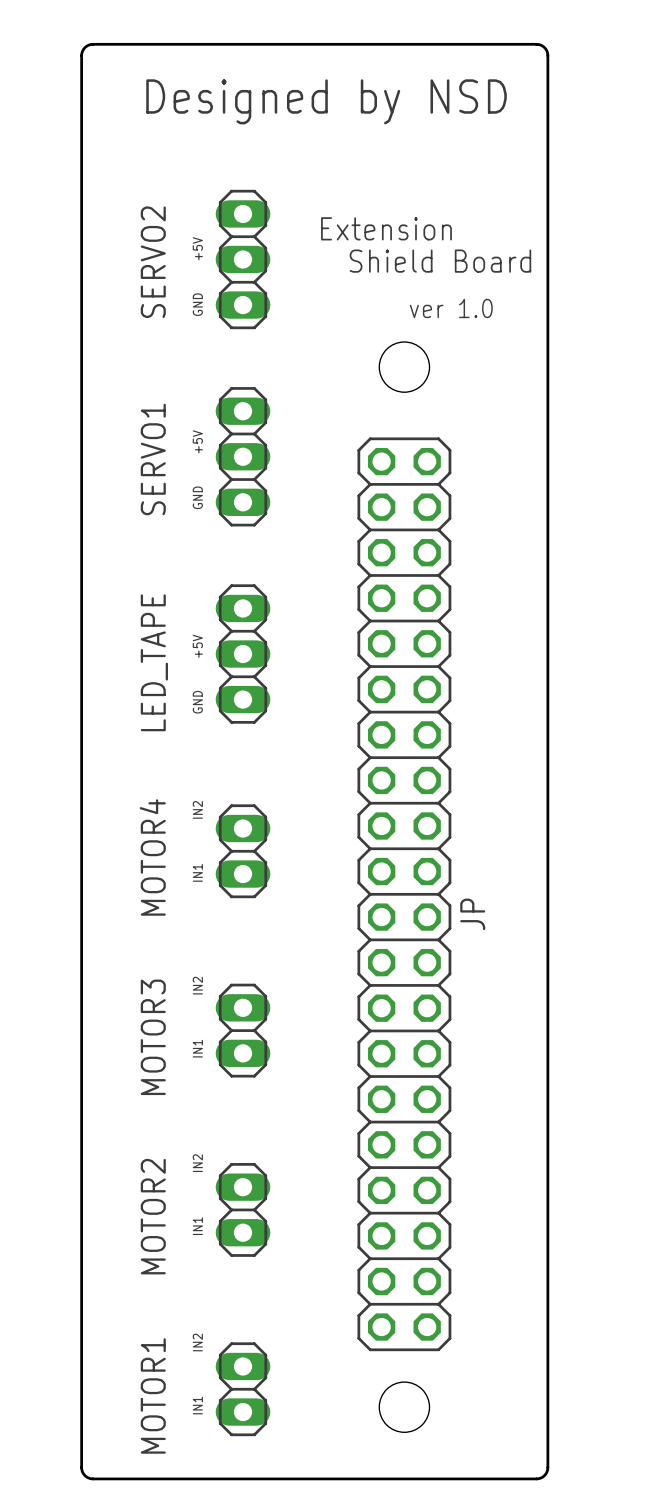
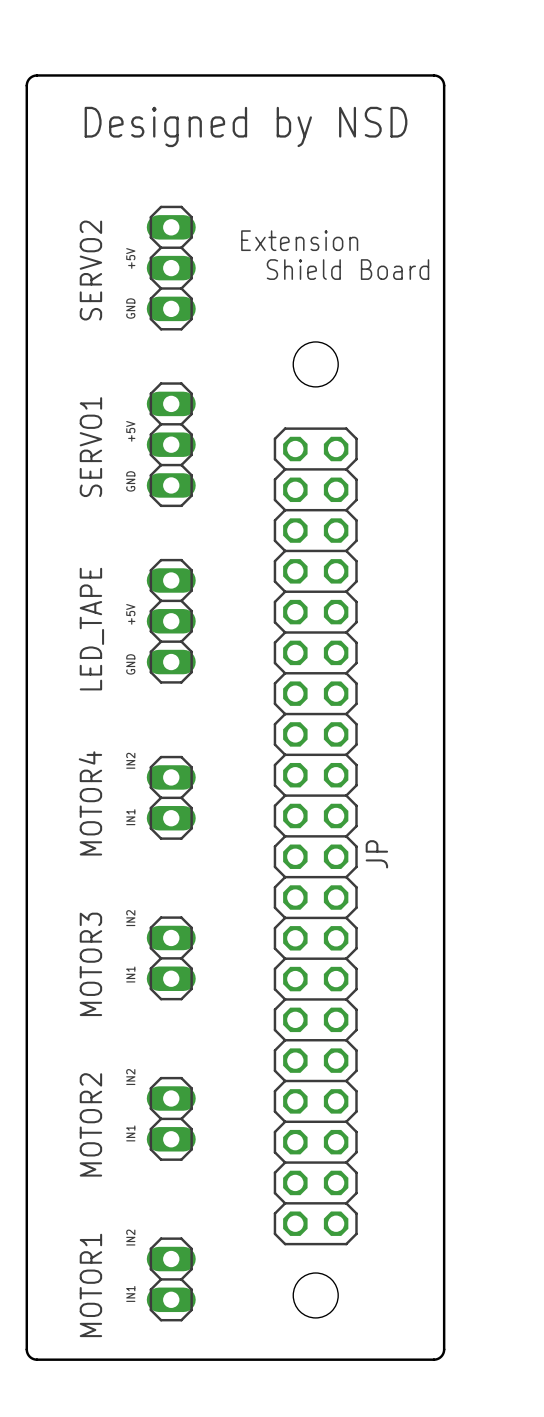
text: ver 1.0 (451, 308) -> none

